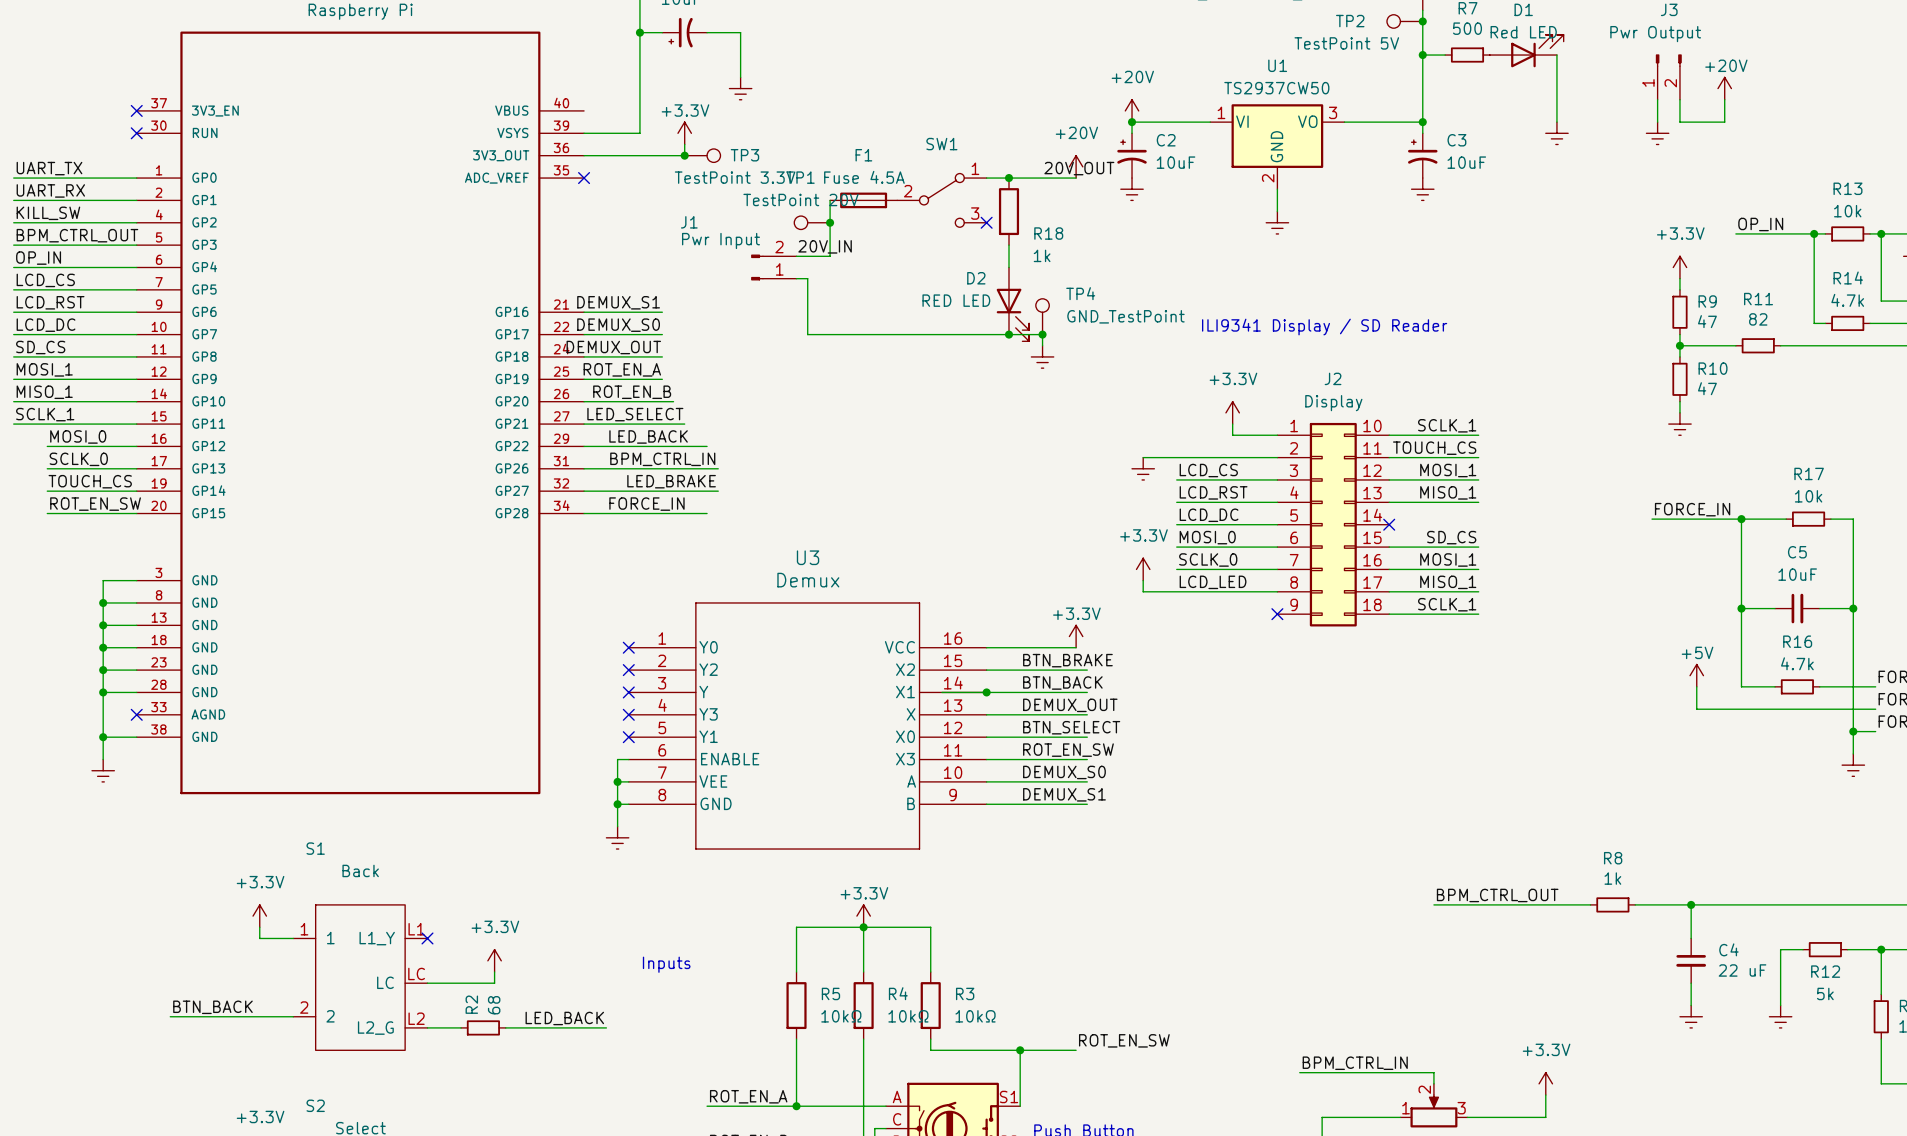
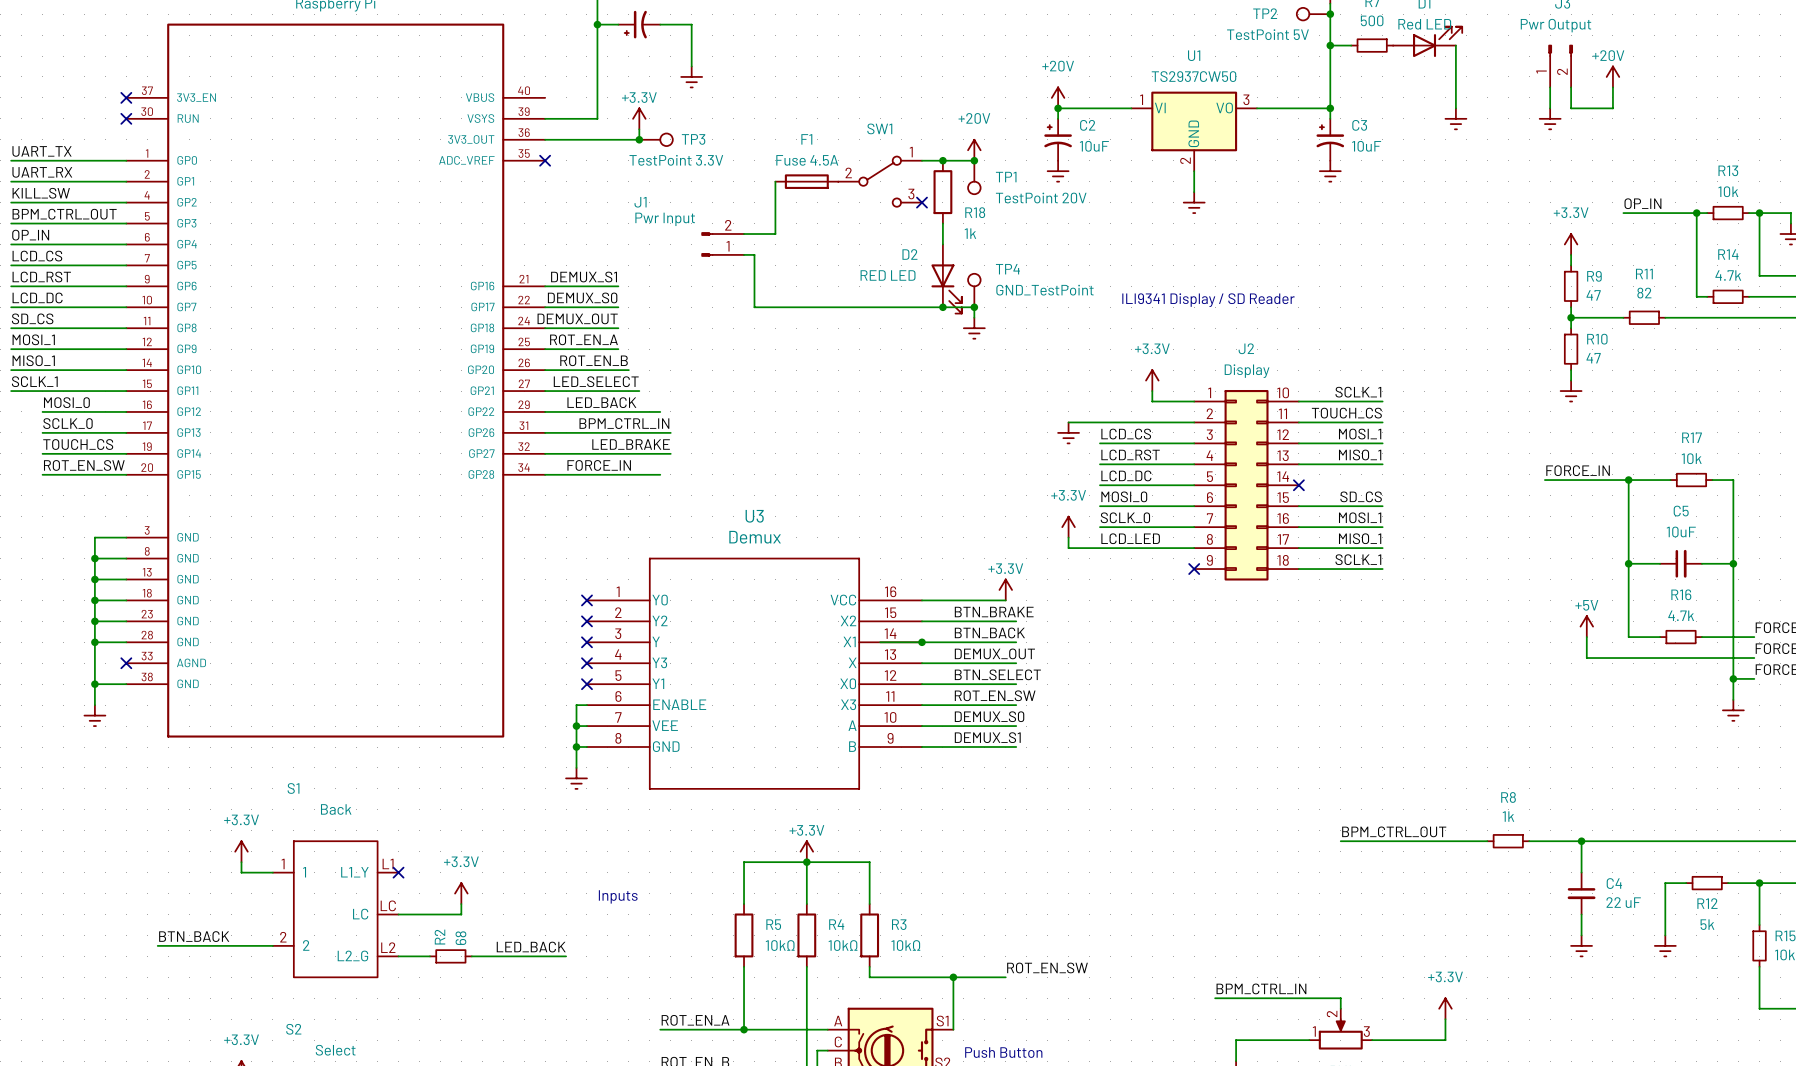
power symbol position: +20V (1076, 166) -> +20V (974, 150)
label: 20V_OUT (1079, 168) -> none
TP1 name position: TP1 (800, 177) -> TP1 (1006, 177)
wire: (1042, 178) (1076, 178) -> none
junction: none -> (974, 160)
TP1 value position: TestPoint 20V (801, 199) -> TestPoint 20V (1041, 198)
TP1 rotation: 0° (801, 222) -> 90° counterclockwise (974, 187)
TP1 position: (812, 222) -> (974, 177)
junction: (830, 222) -> none
label: 20V_IN (825, 246) -> none

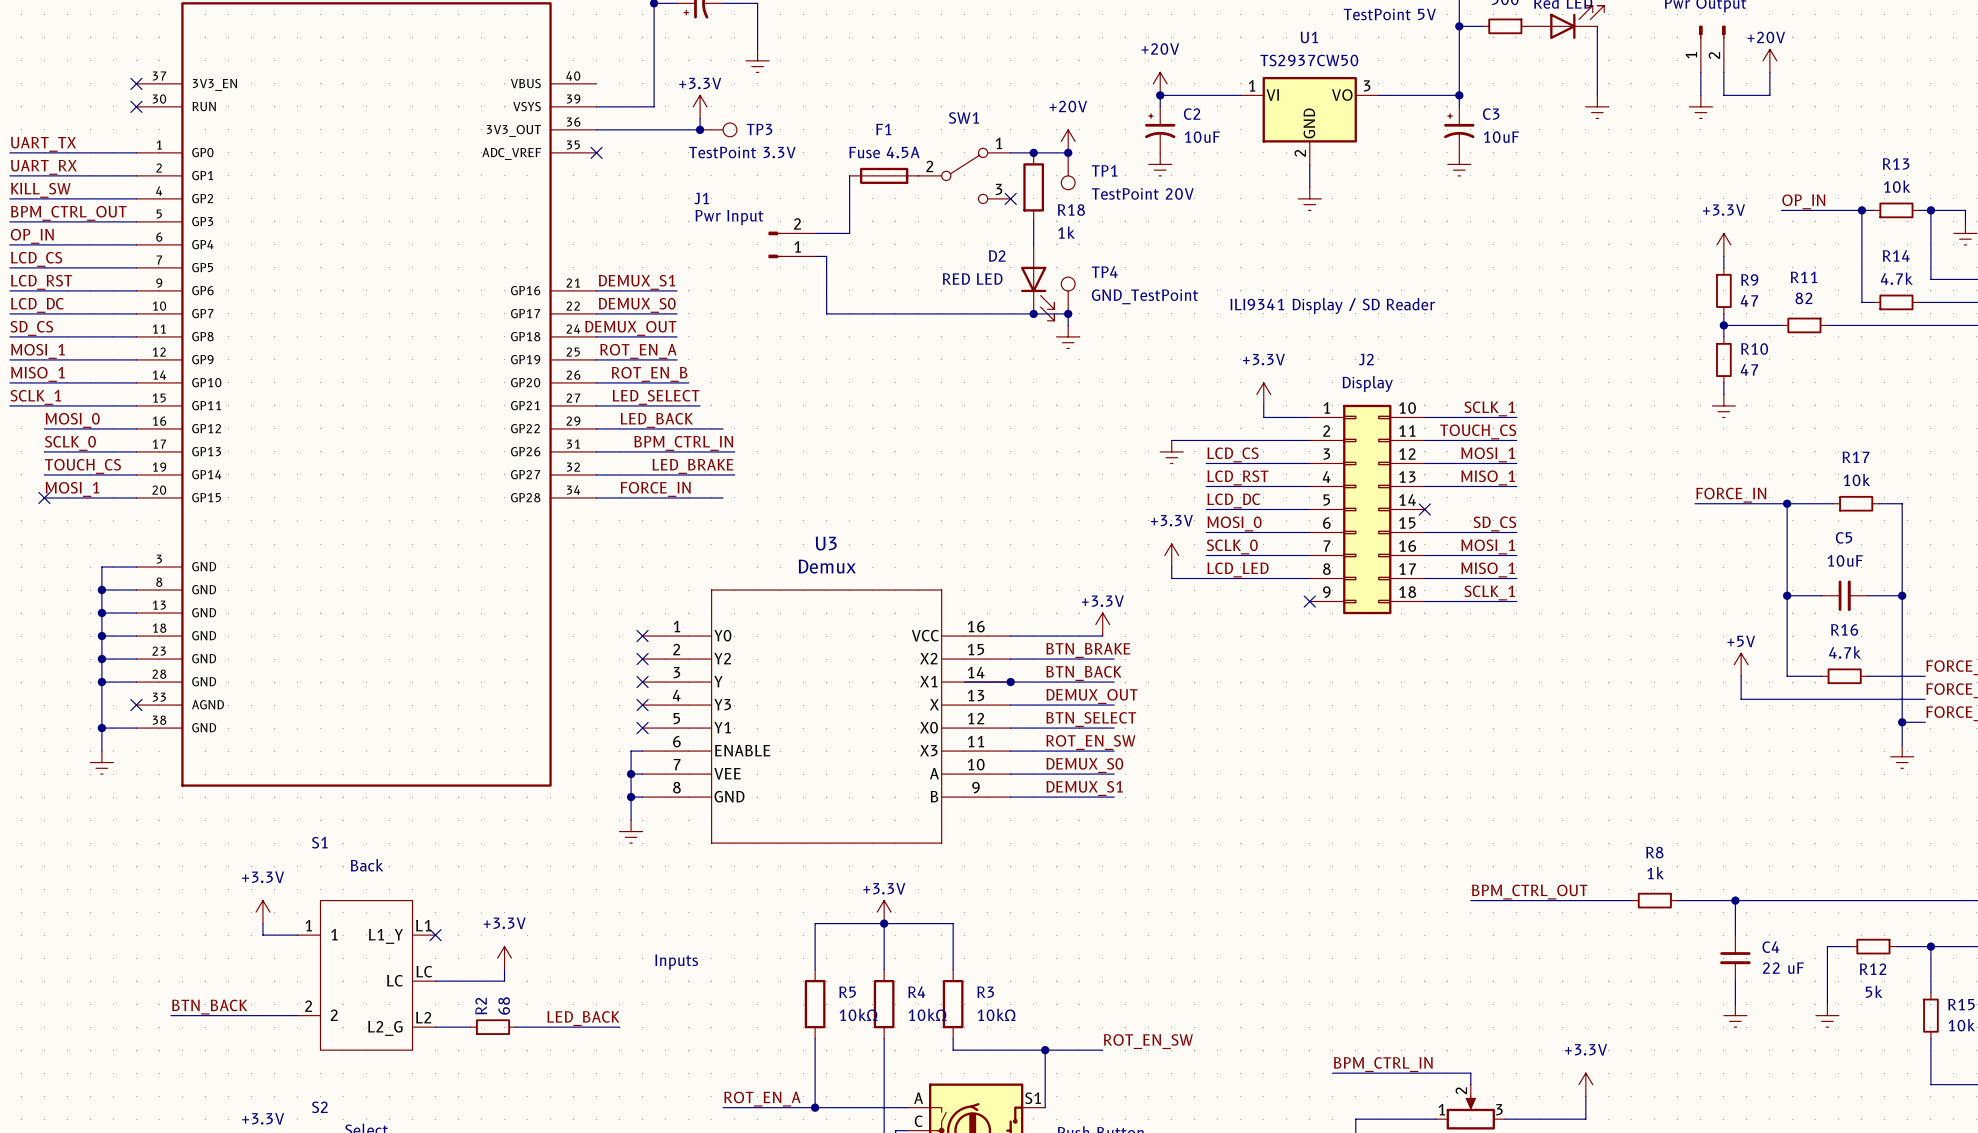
label: ROT_EN_SW (84, 465) -> MOSI_1 (72, 489)
no-connect mark: none -> (44, 497)

